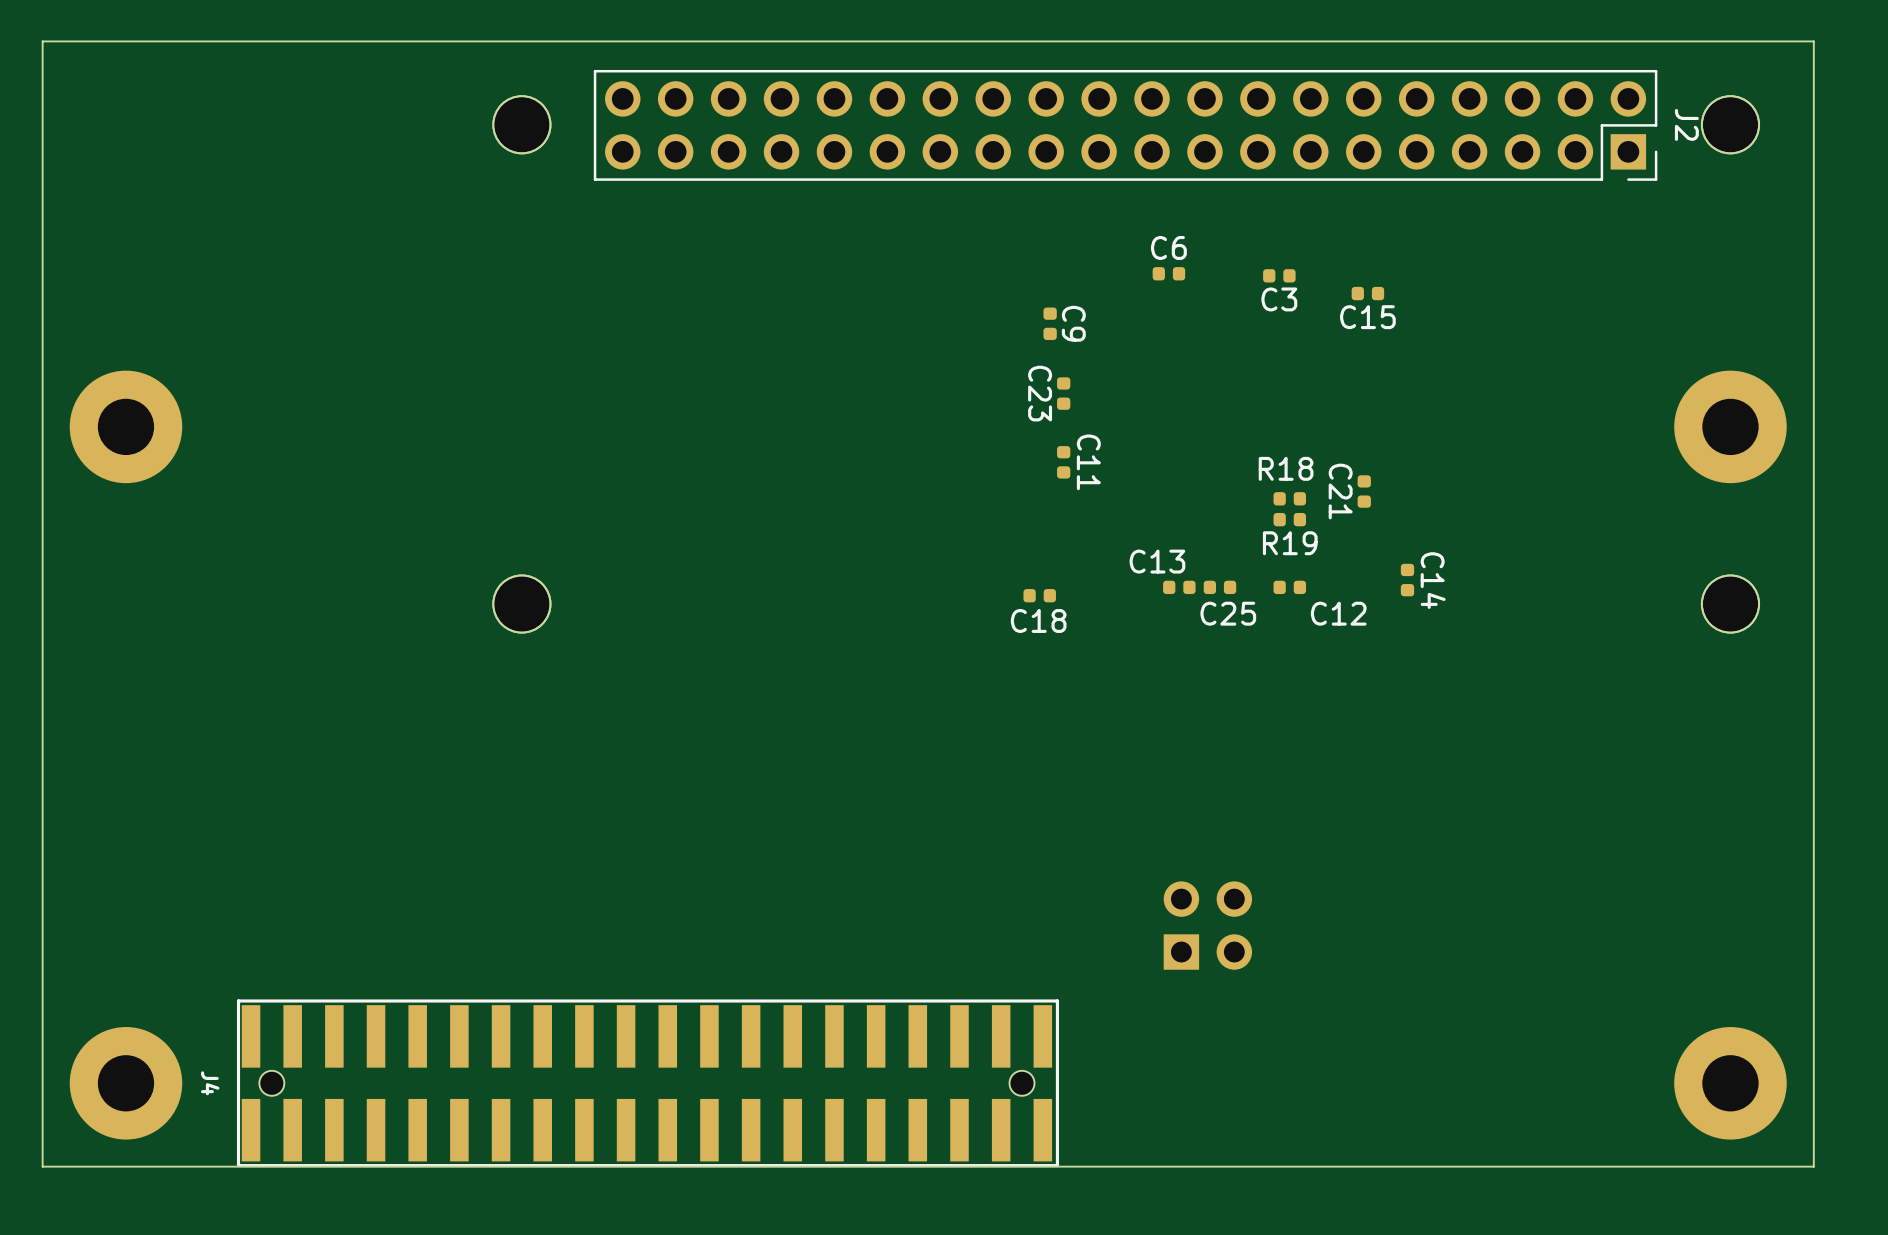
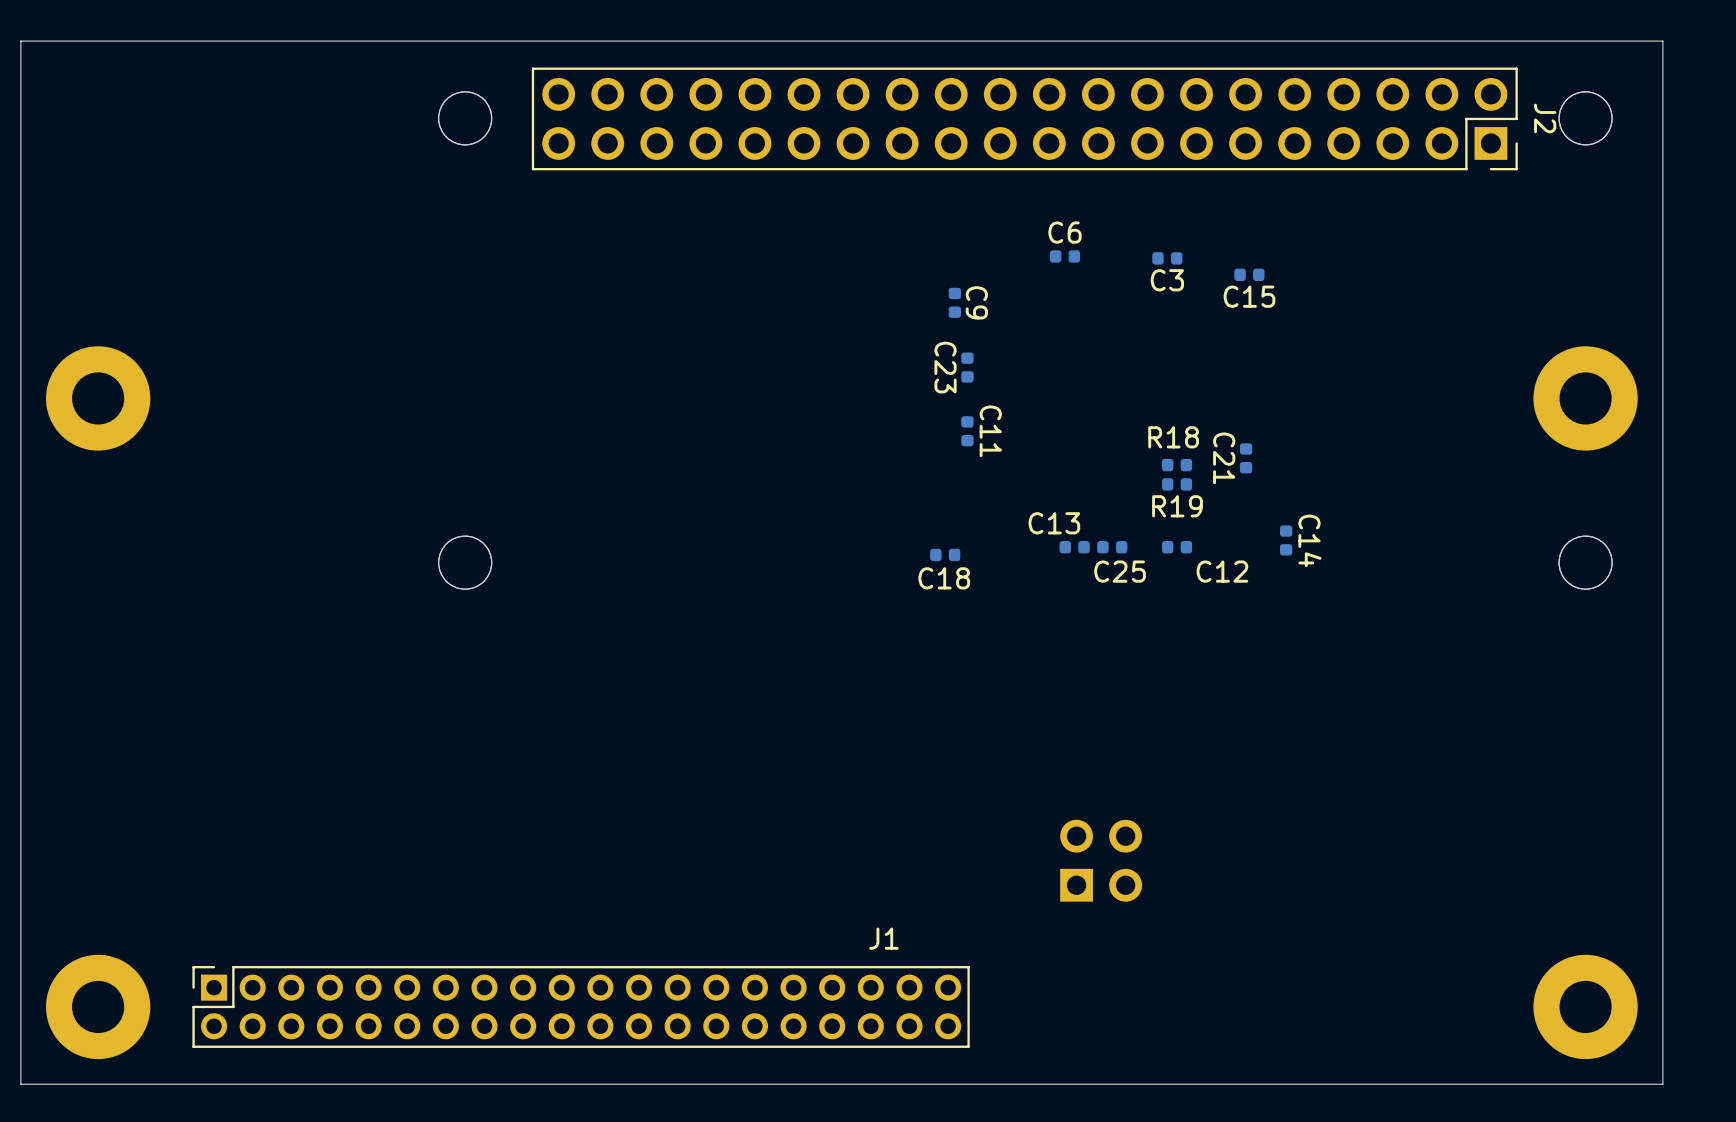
J1: none -> (581, 1006)
J4: (647, 1083) -> none

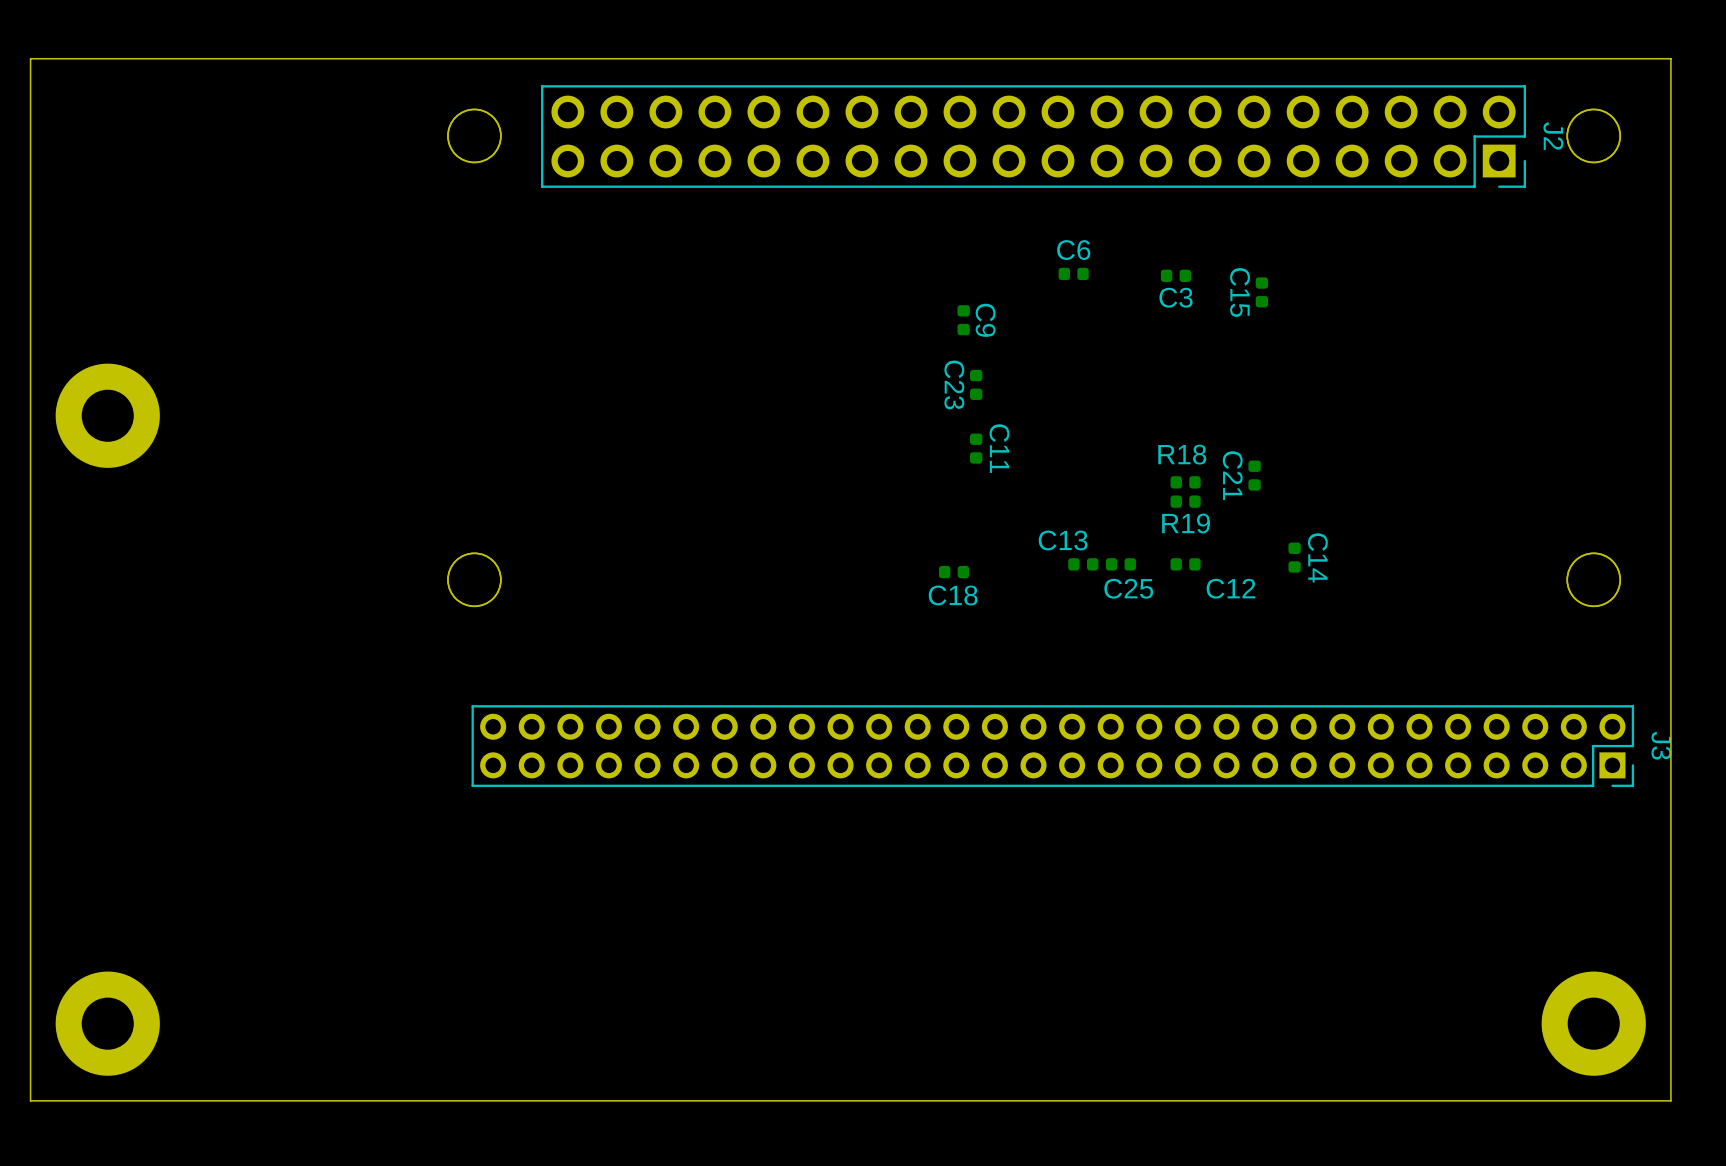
C15 rotation: 0° (1249, 274) -> 90° clockwise (1261, 292)
part: (1585, 398) -> none
J3: none -> (1052, 746)
part: (1101, 860) -> none
J1: (581, 1006) -> none

